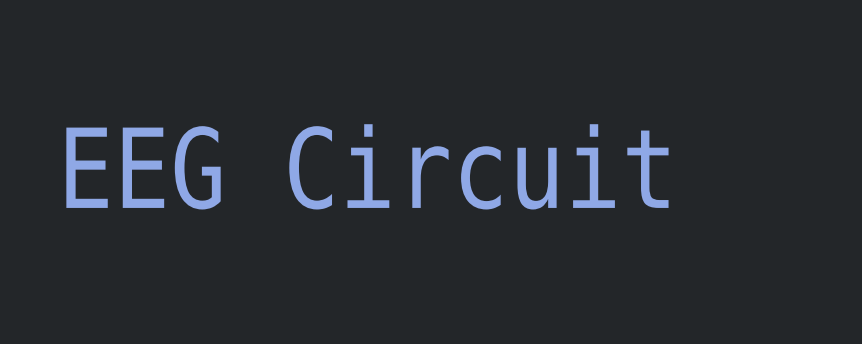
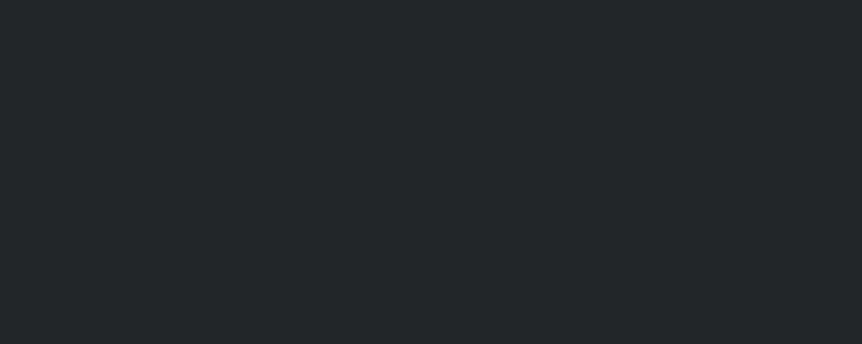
text: EEG Circuit (367, 166) -> none

